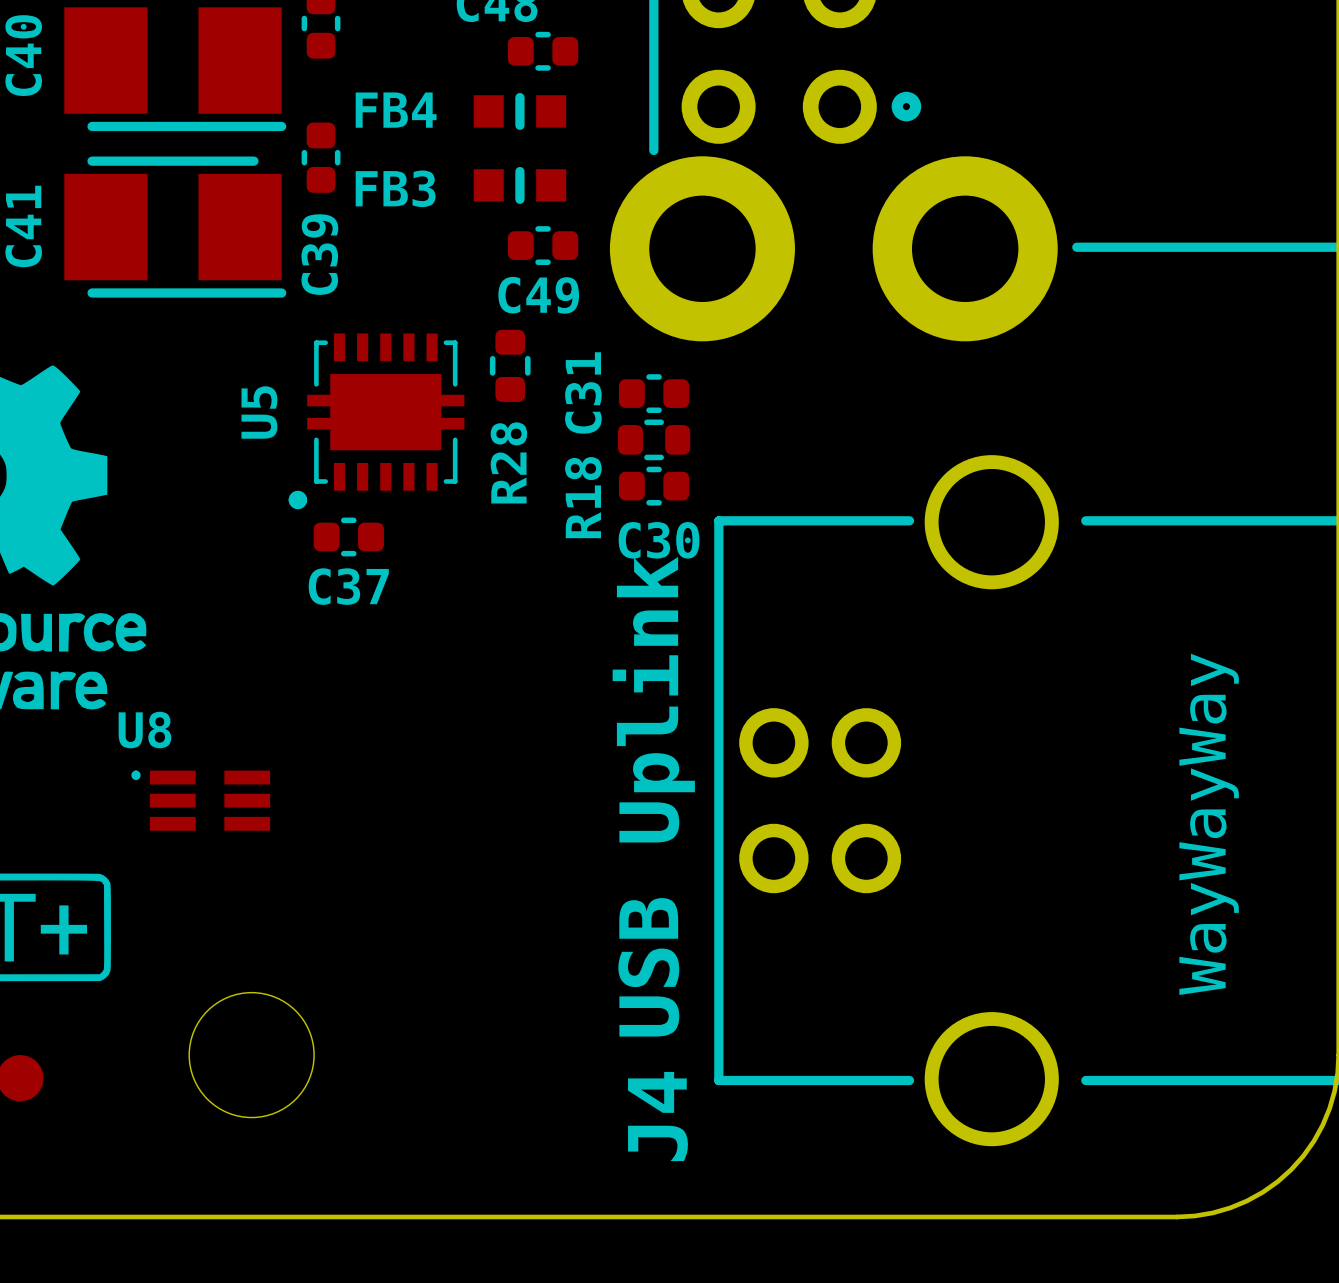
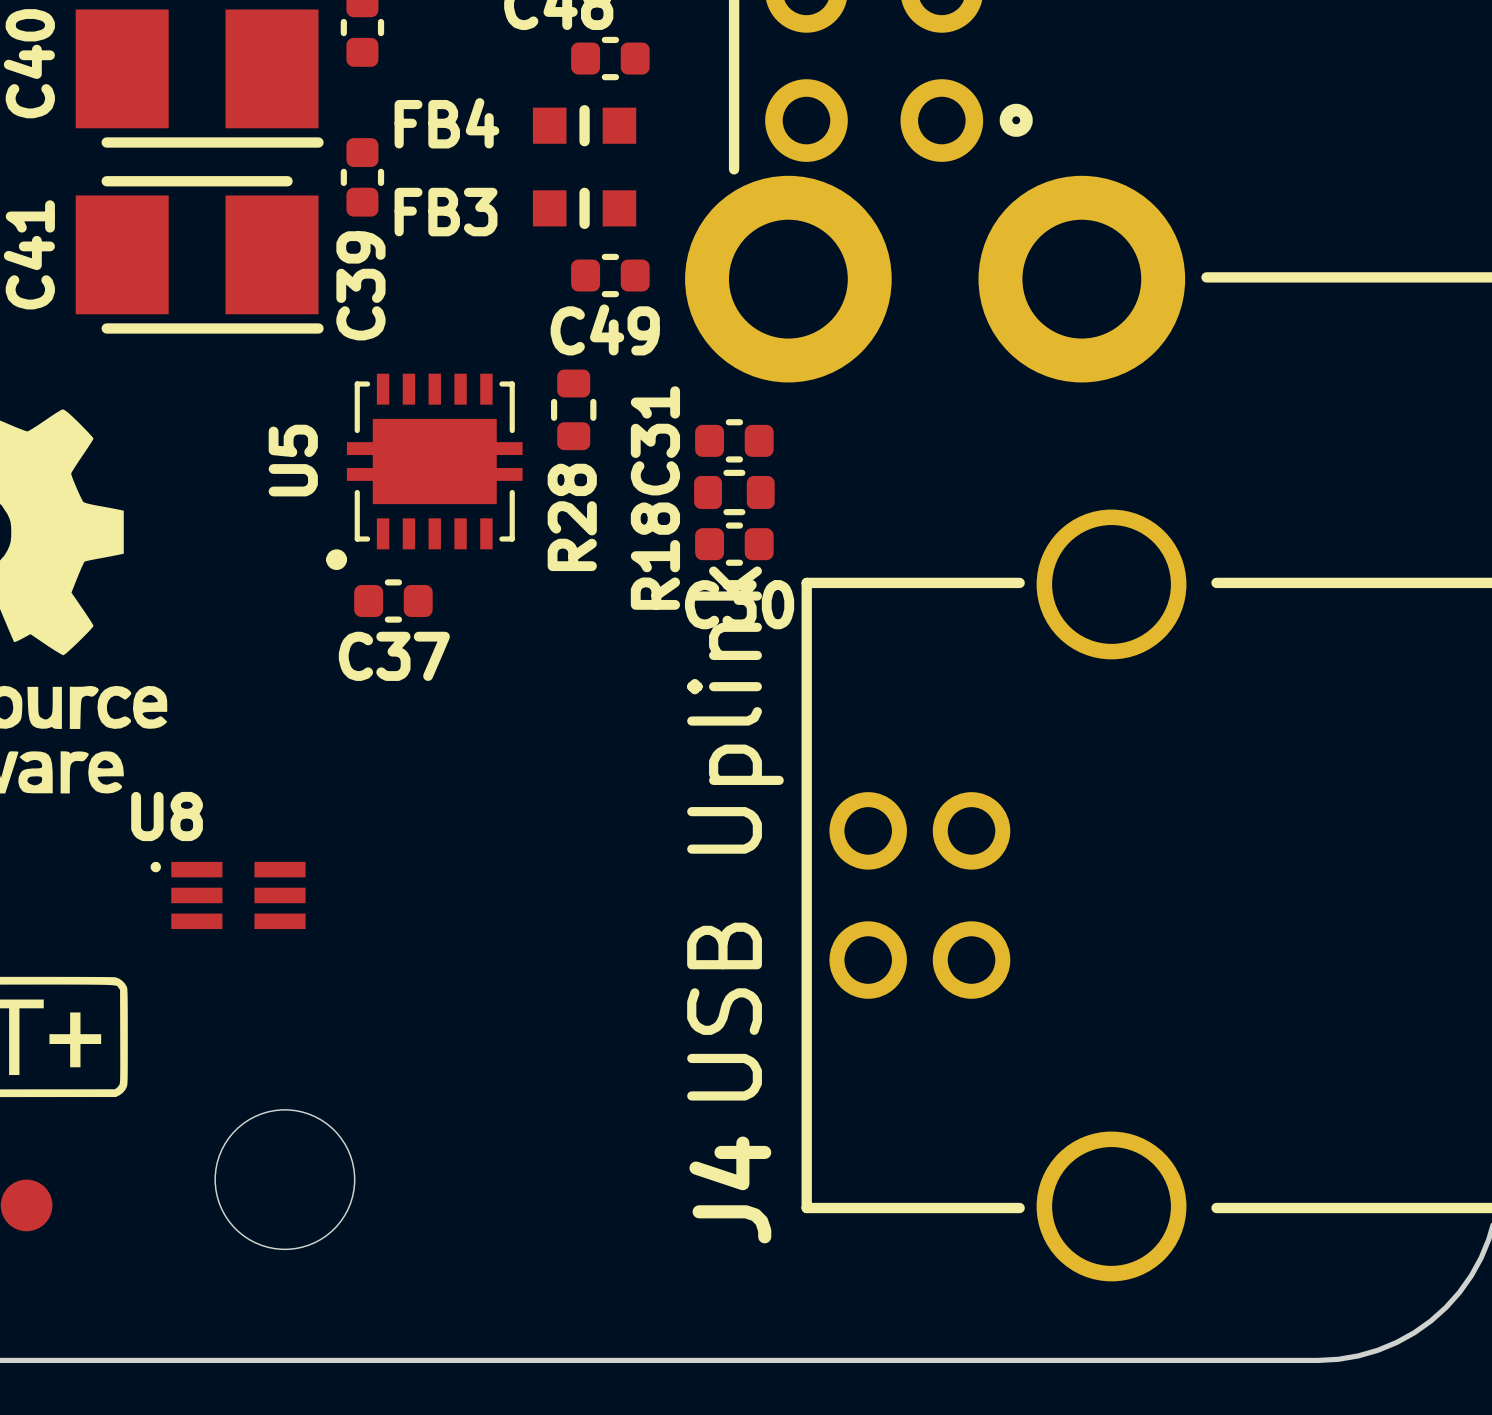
text position: USB Uplink (653, 796) -> USB Uplink (735, 833)
text: WayWayWay (1209, 824) -> none
J4 name position: J4 (657, 1116) -> J4 (730, 1189)

